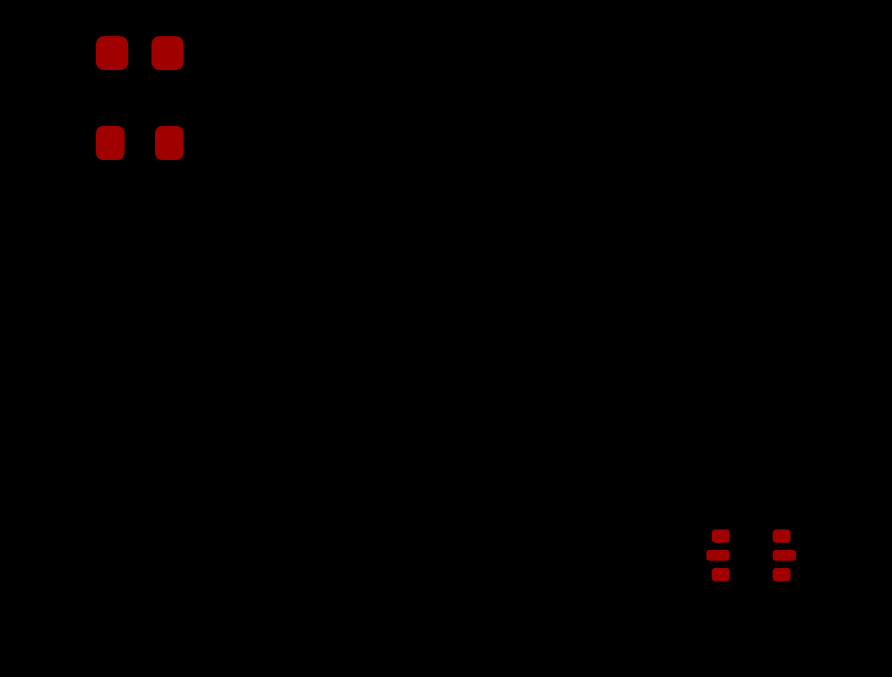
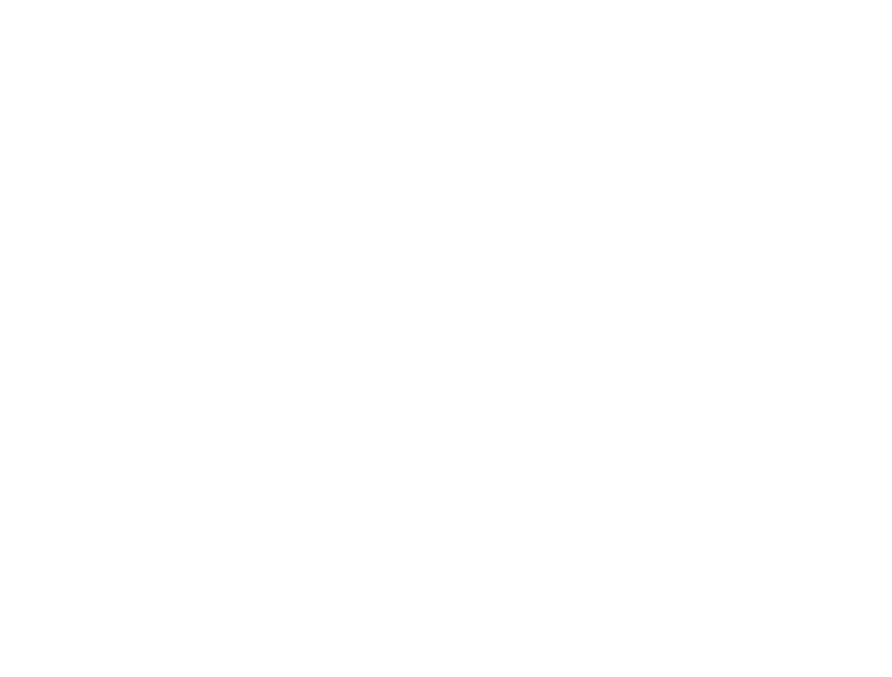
part: (139, 53) -> none
part: (139, 142) -> none
part: (751, 555) -> none

